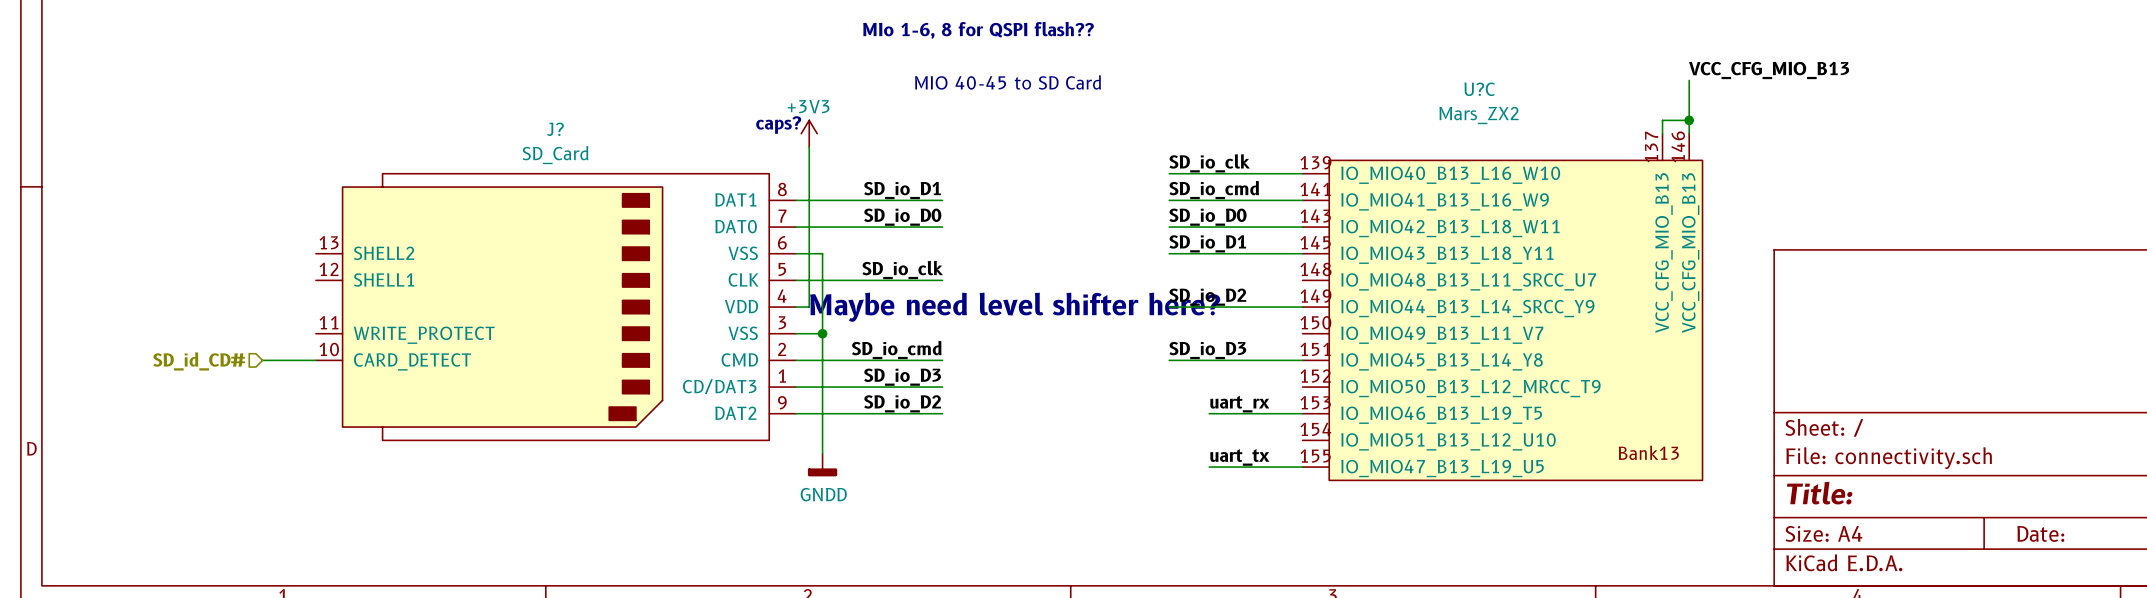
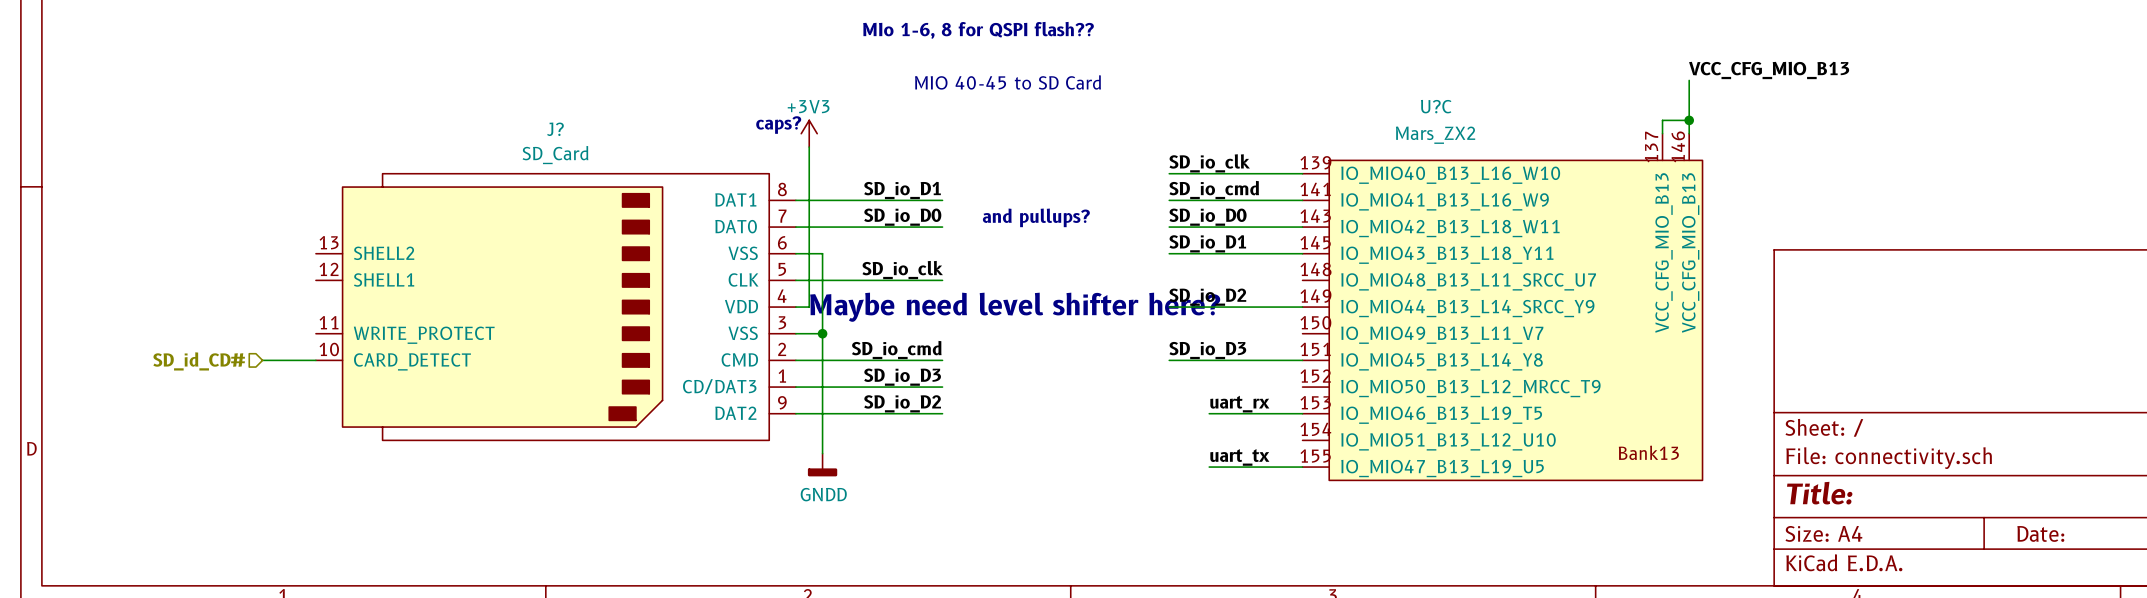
U?C name position: U?C (1479, 89) -> U?C (1436, 106)
U?C value position: Mars_ZX2 (1479, 115) -> Mars_ZX2 (1435, 135)
text: none -> and pullups? (1036, 217)

